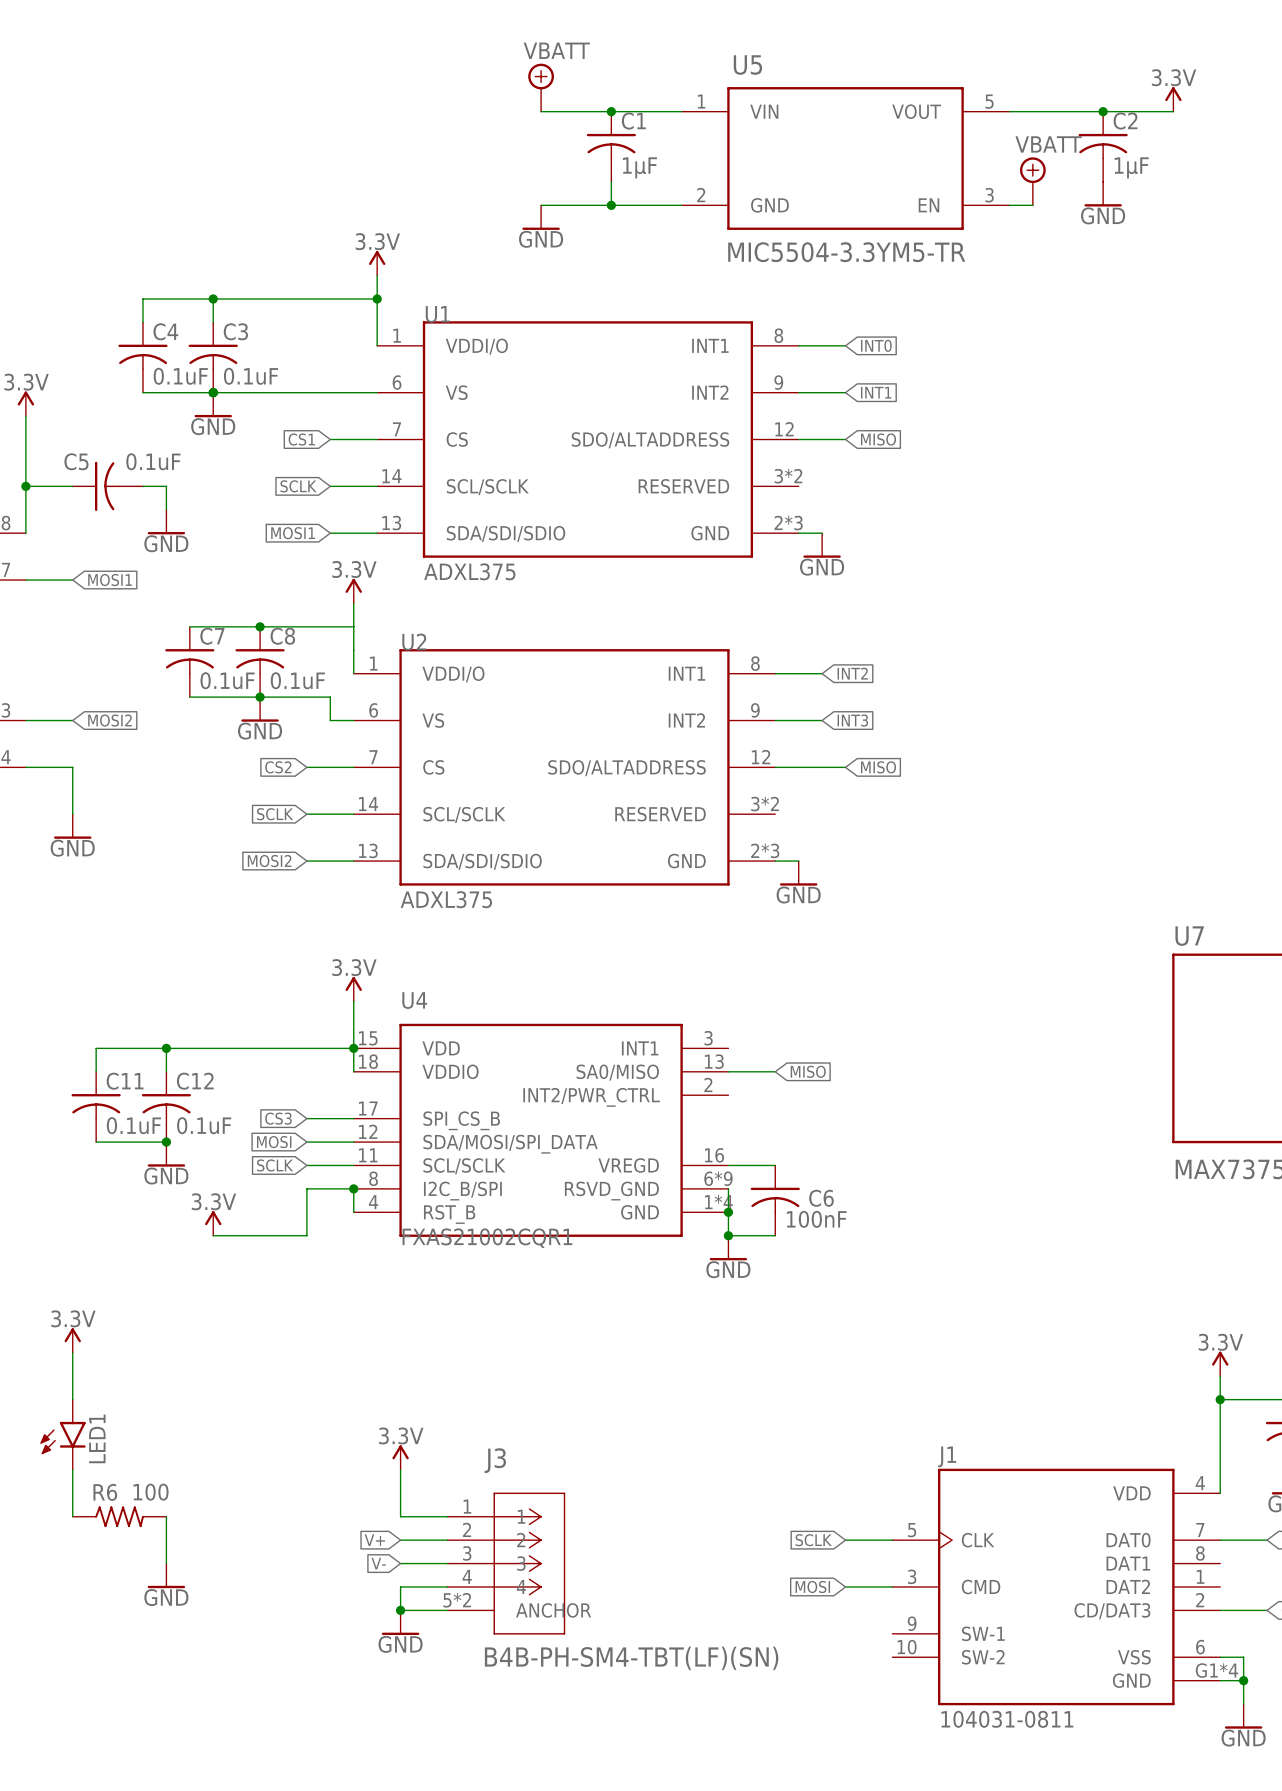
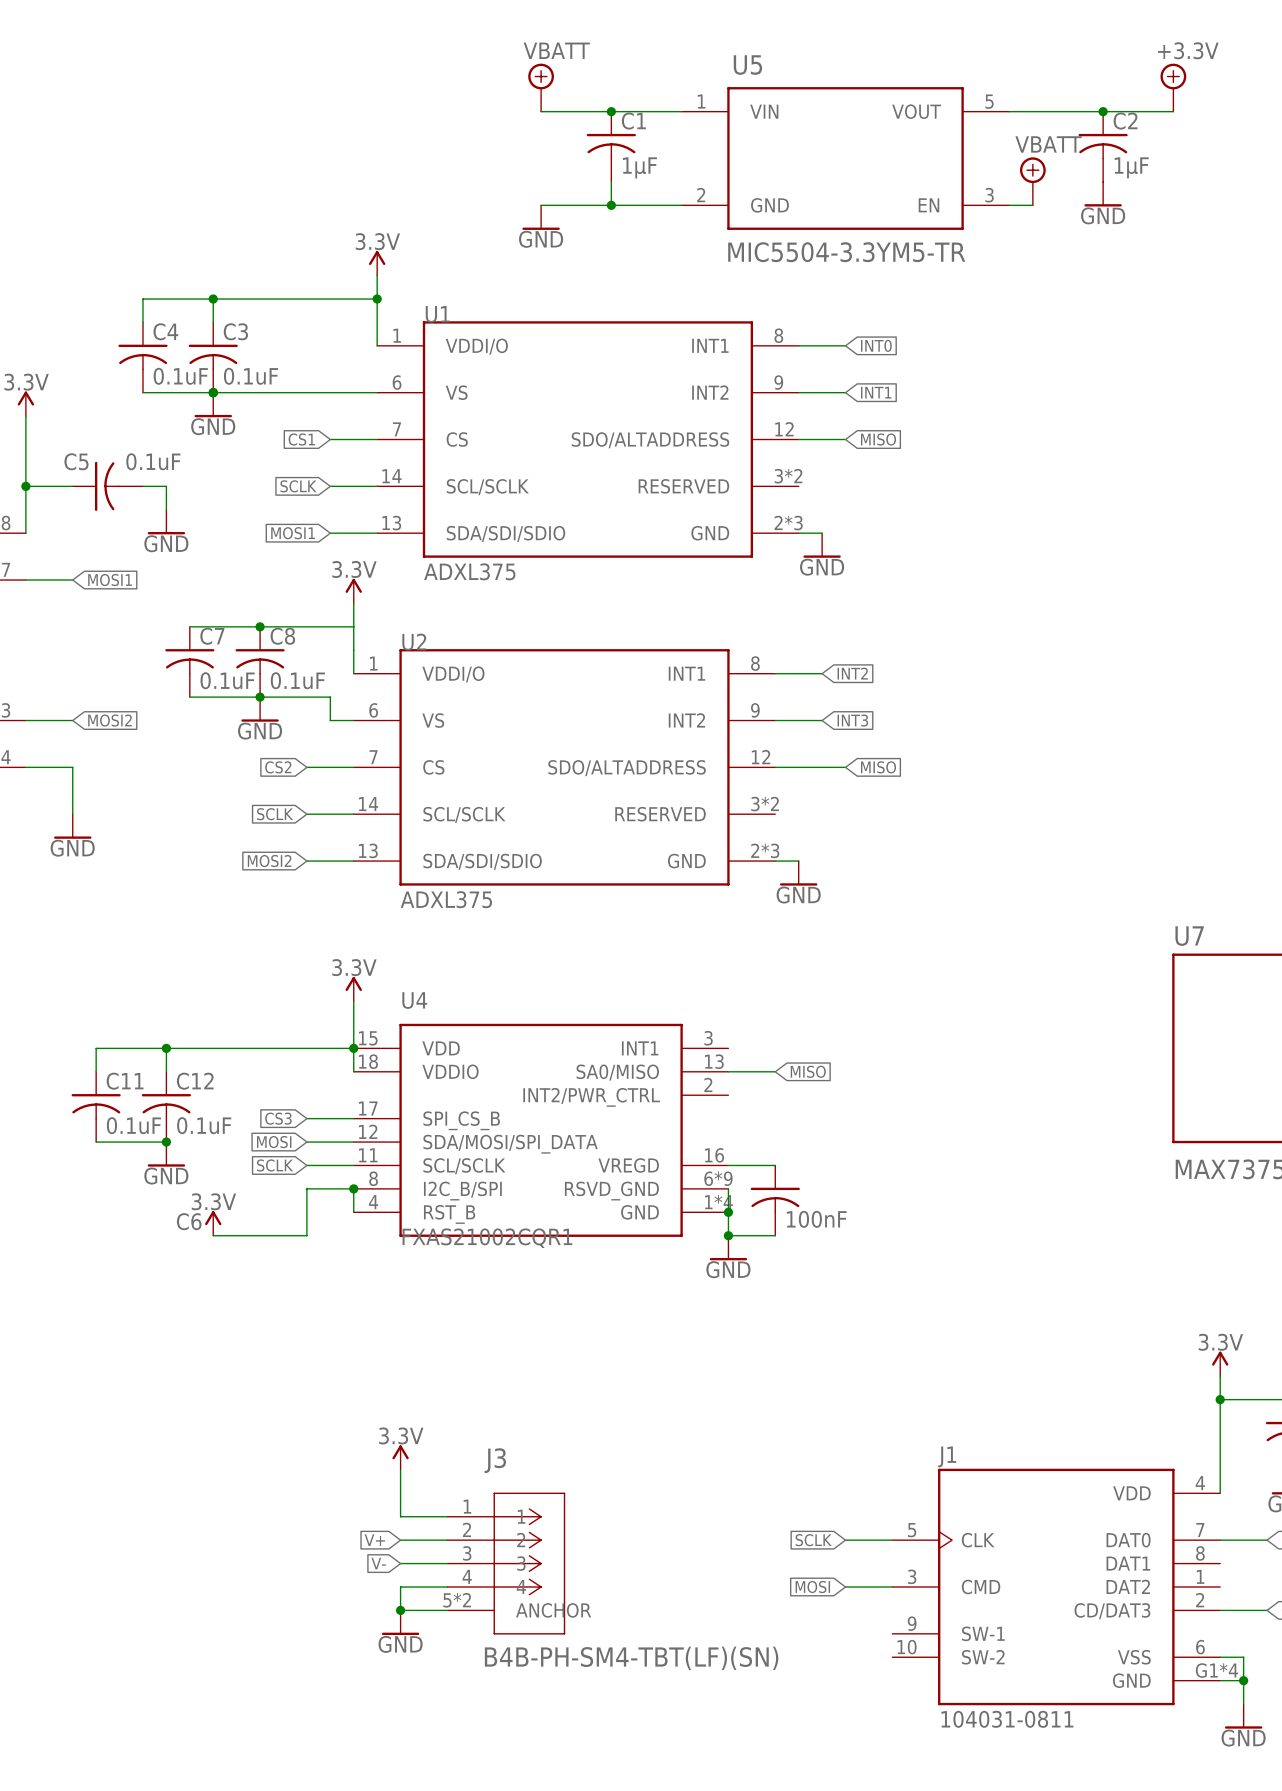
power symbol: none -> +3.3V (1173, 87)
power symbol: 3.3V (1173, 99) -> none
C6 name position: C6 (821, 1198) -> C6 (189, 1221)
power symbol: 3.3V (72, 1340) -> none
wire: (72, 1352) (72, 1399) -> none
LED1: (63, 1434) -> none
wire: (72, 1469) (72, 1516) -> none
R6: 100 (119, 1516) -> none
wire: (166, 1516) (166, 1563) -> none
power symbol: GND (166, 1575) -> none

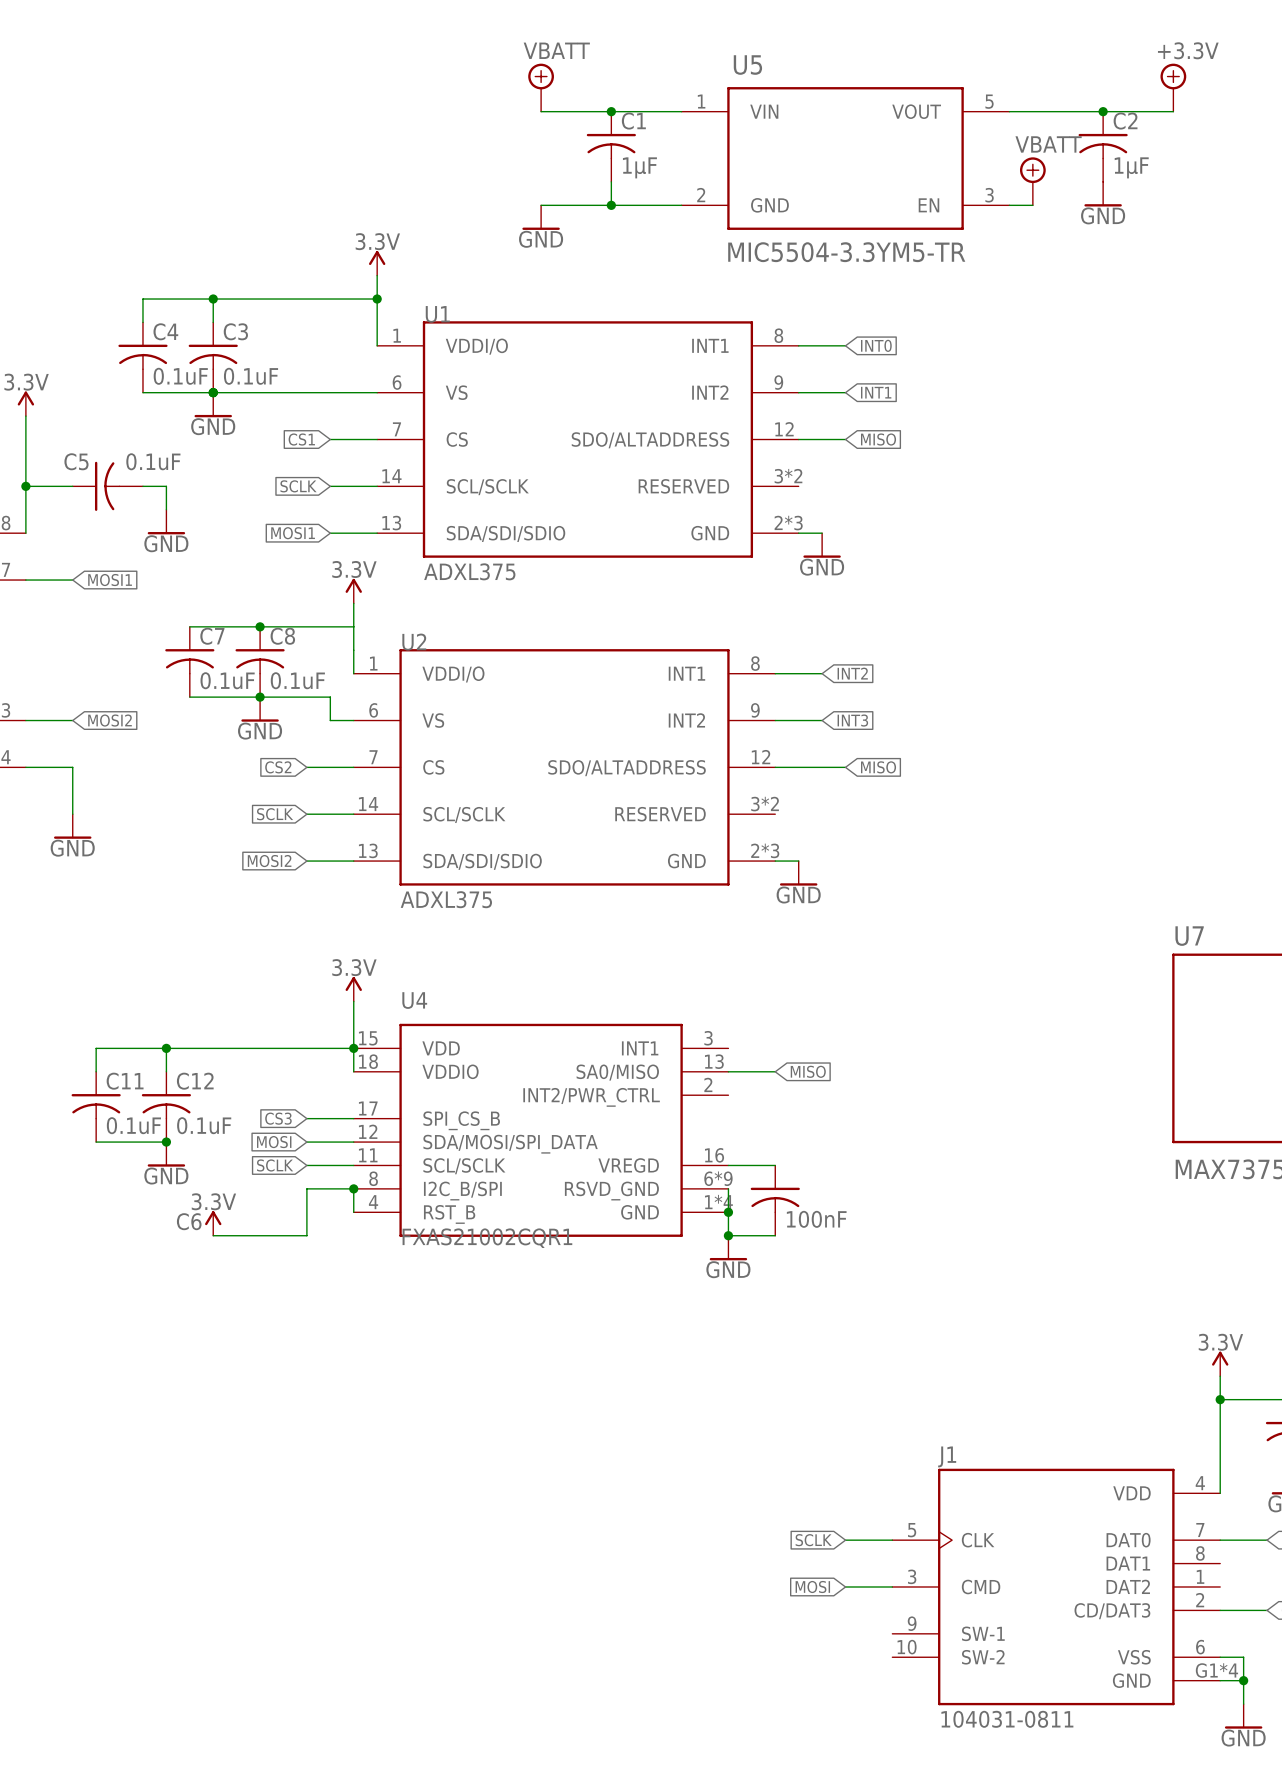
power symbol: 3.3V (400, 1457) -> none
wire: (400, 1469) (400, 1516) (447, 1516) -> none
global label: V+ (374, 1540) -> none
wire: (400, 1540) (447, 1540) -> none
global label: V- (378, 1563) -> none
wire: (400, 1563) (447, 1563) -> none
J3: B4B-PH-SM4-TBT(LF)(SN) (506, 1563) -> none
wire: (447, 1586) (400, 1586) (400, 1610) (447, 1610) -> none
junction: (400, 1610) -> none
power symbol: GND (400, 1622) -> none

